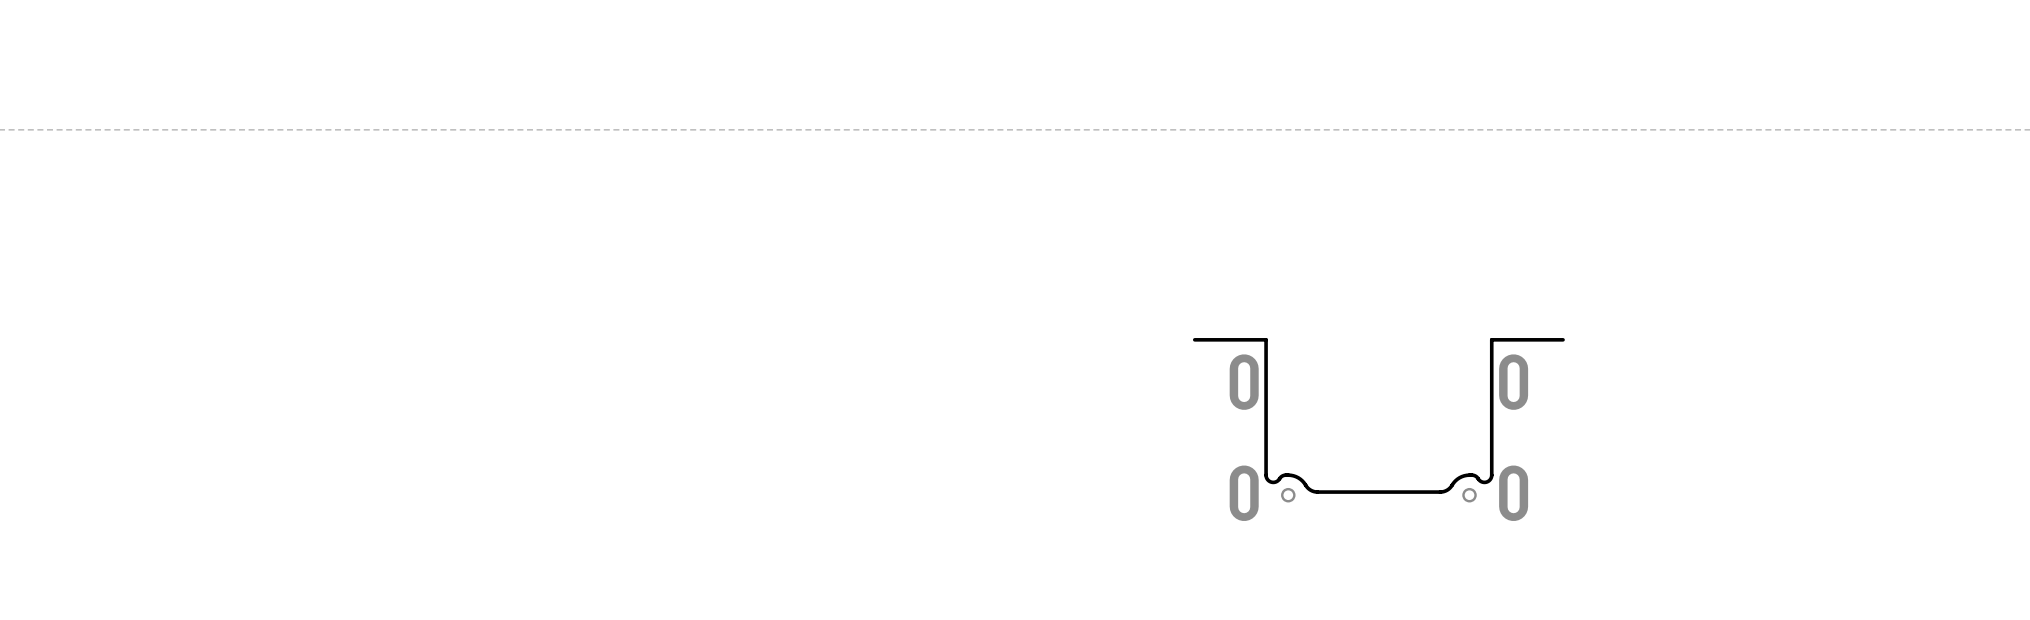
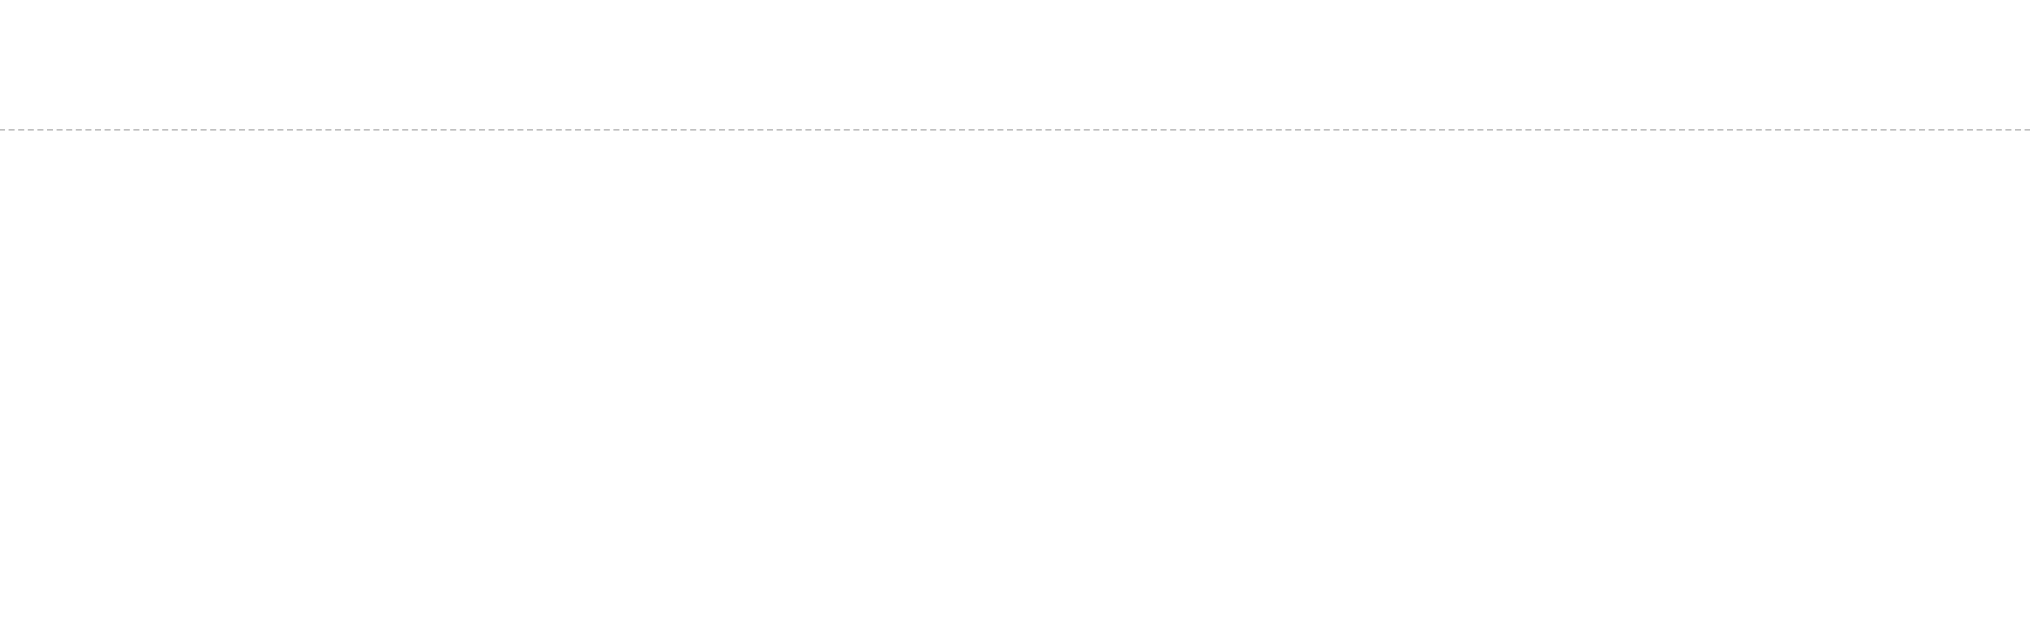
part: (1378, 429) -> none

